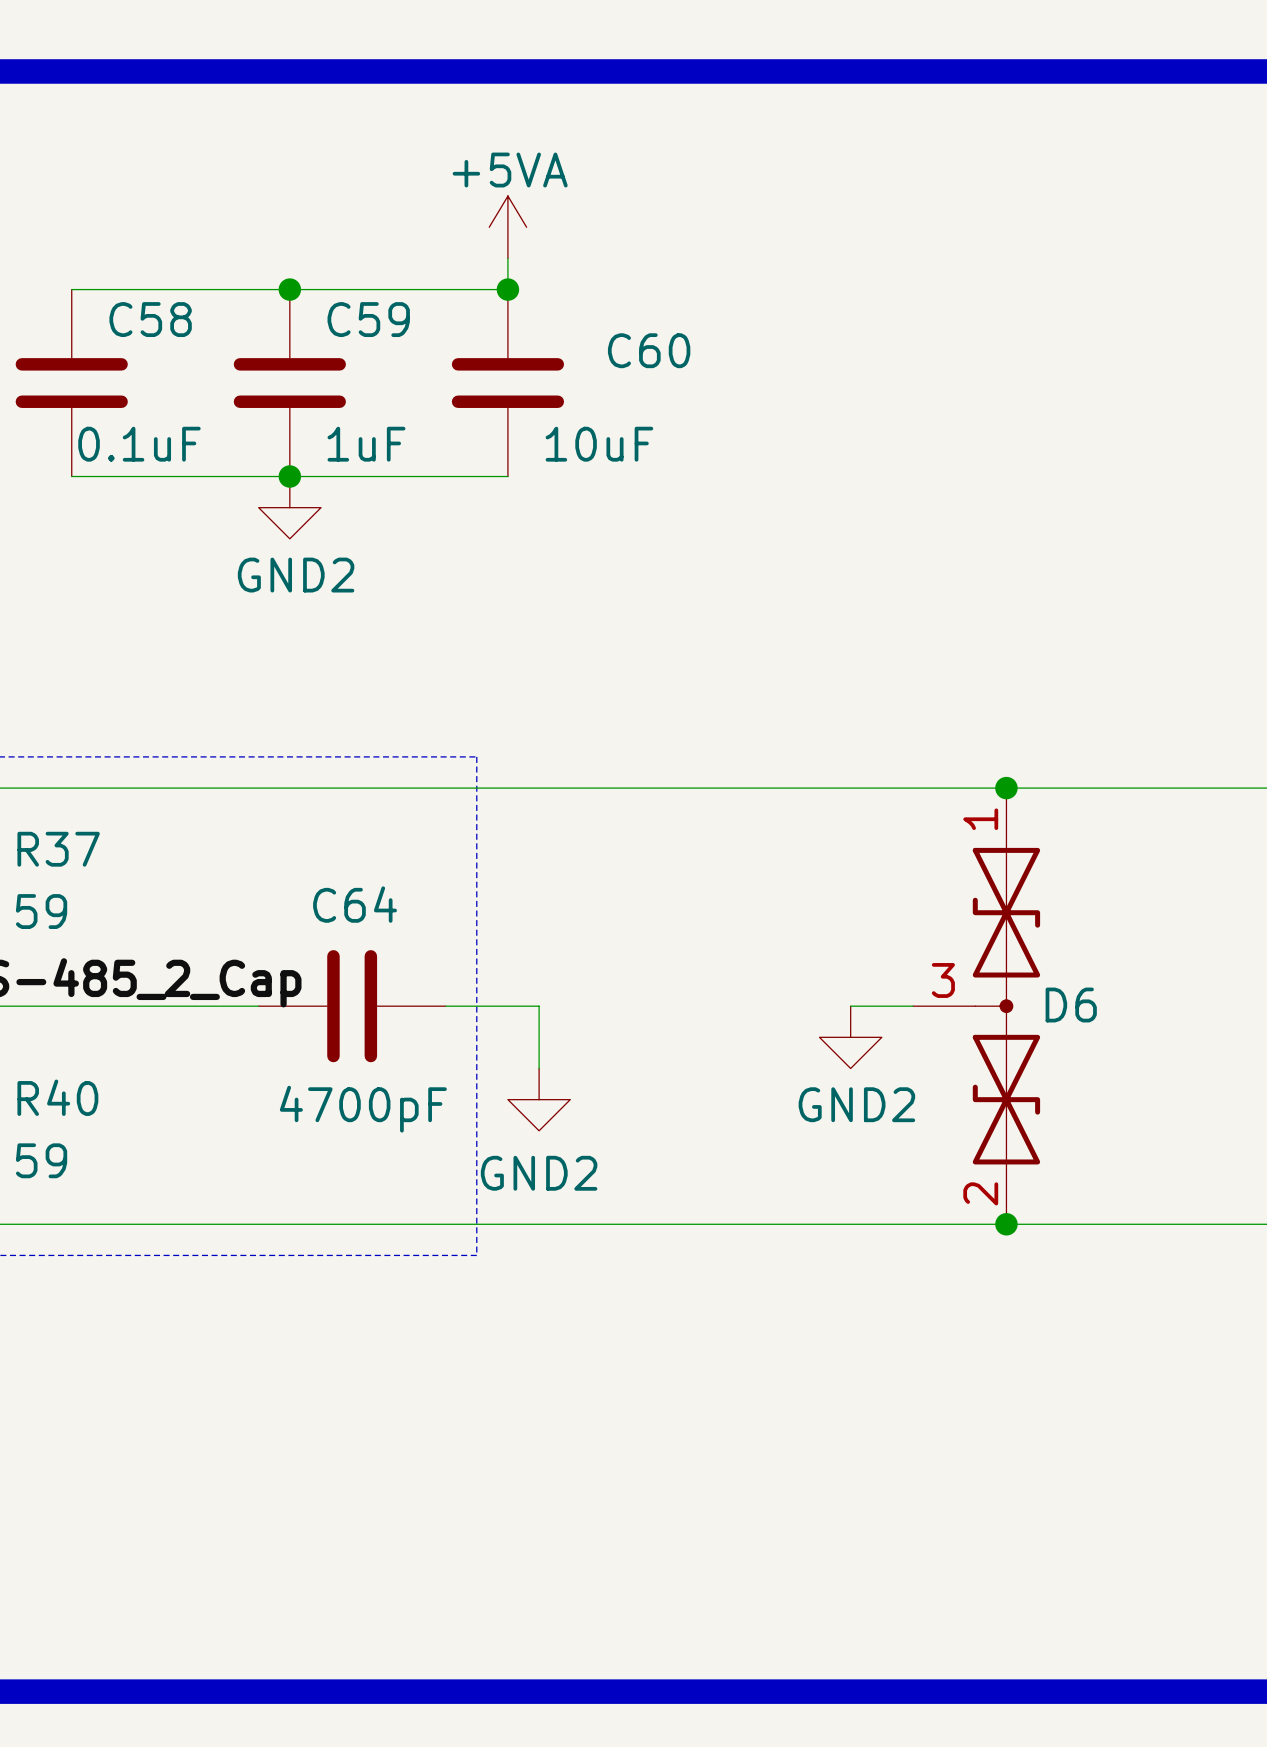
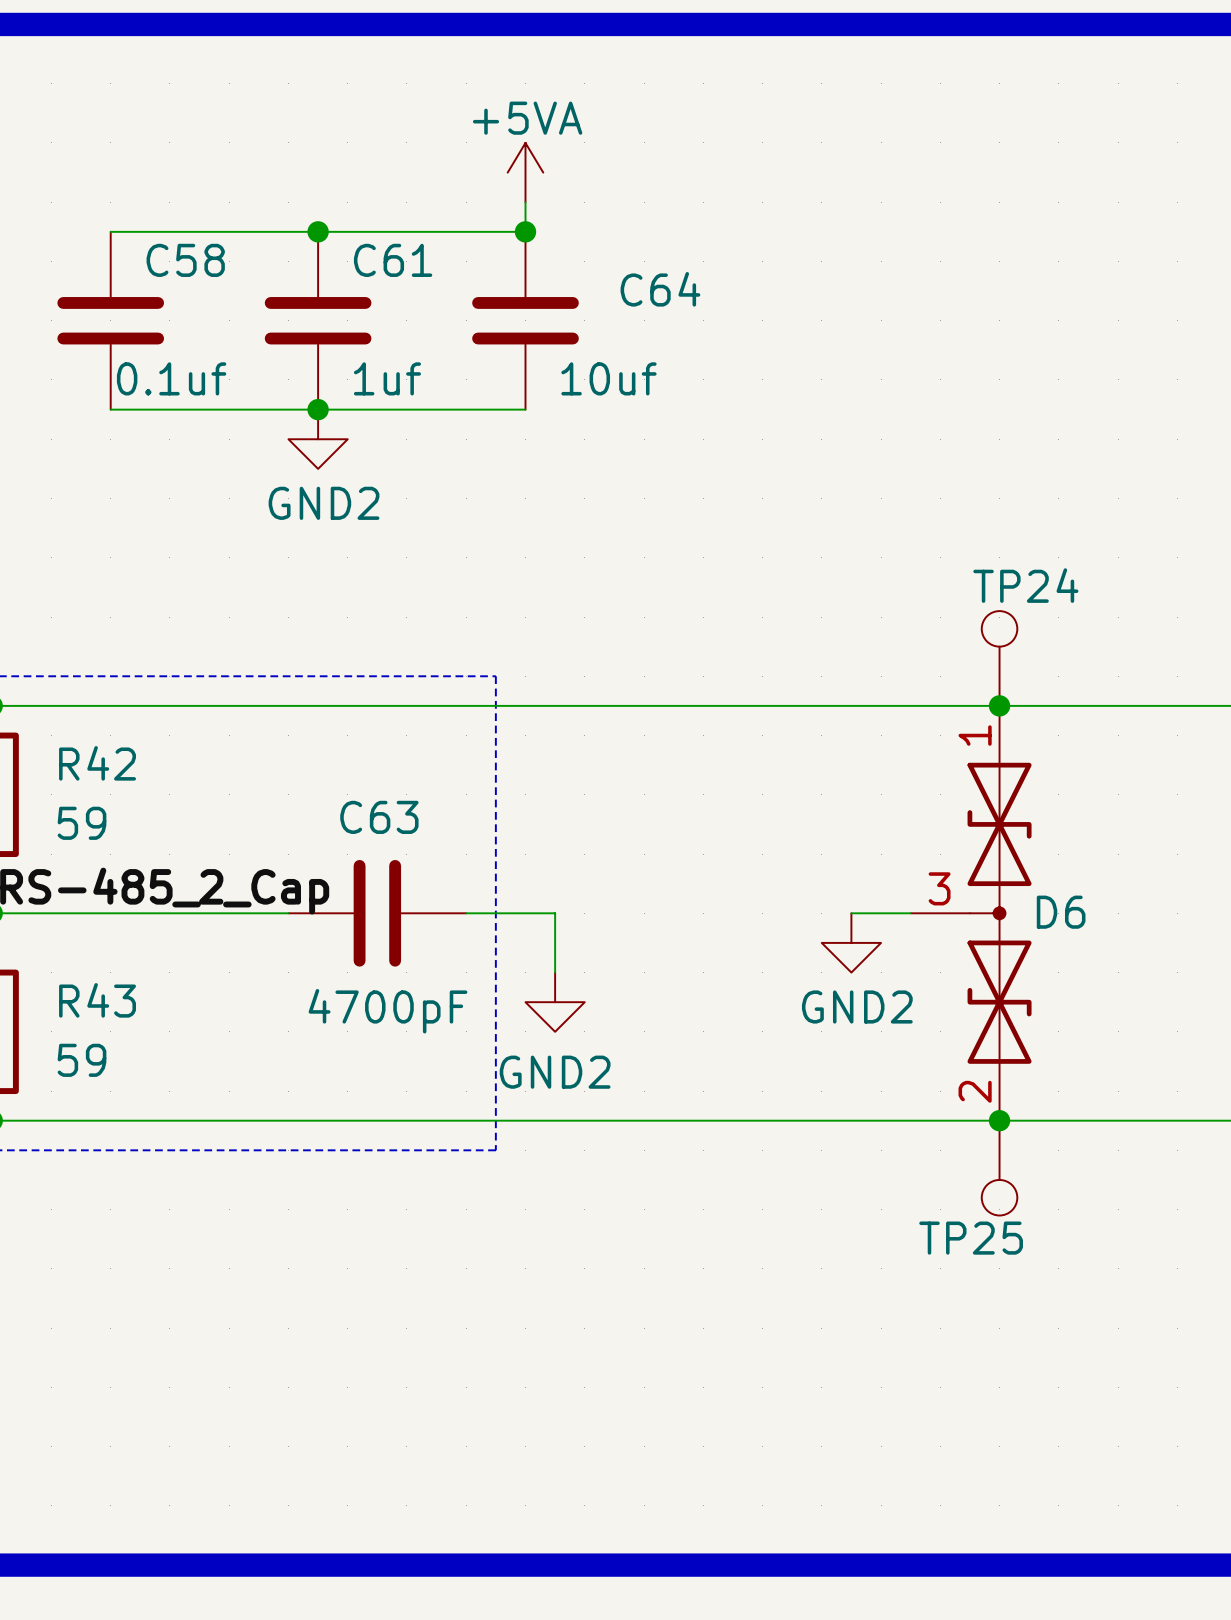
C59 name: C59 (368, 319) -> C61 (393, 260)
C60 name: C60 (649, 350) -> C64 (660, 289)
C58 value: 0.1uF (139, 444) -> 0.1uf (171, 378)
C59 value: 1uF (366, 444) -> 1uf (387, 378)
C60 value: 10uF (599, 444) -> 10uf (608, 378)
TP24: none -> (999, 658)
R37 name: R37 (58, 849) -> R42 (97, 763)
C64 name: C64 (355, 904) -> C63 (379, 817)
R40 name: R40 (57, 1097) -> R43 (97, 1000)
TP25: none -> (999, 1168)

